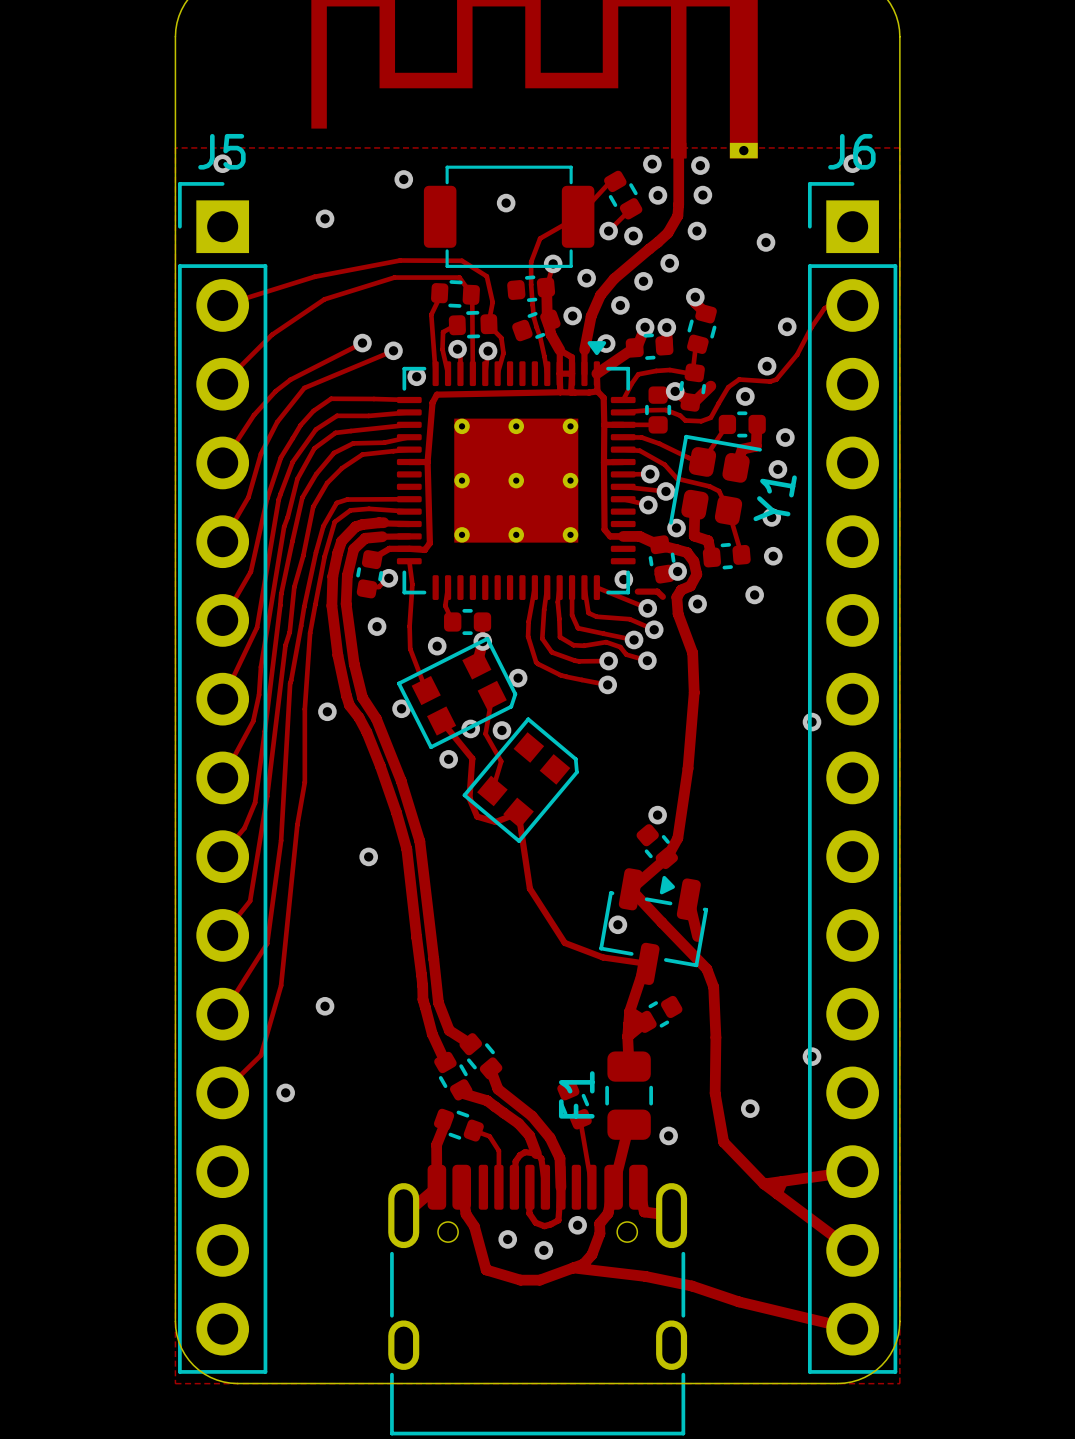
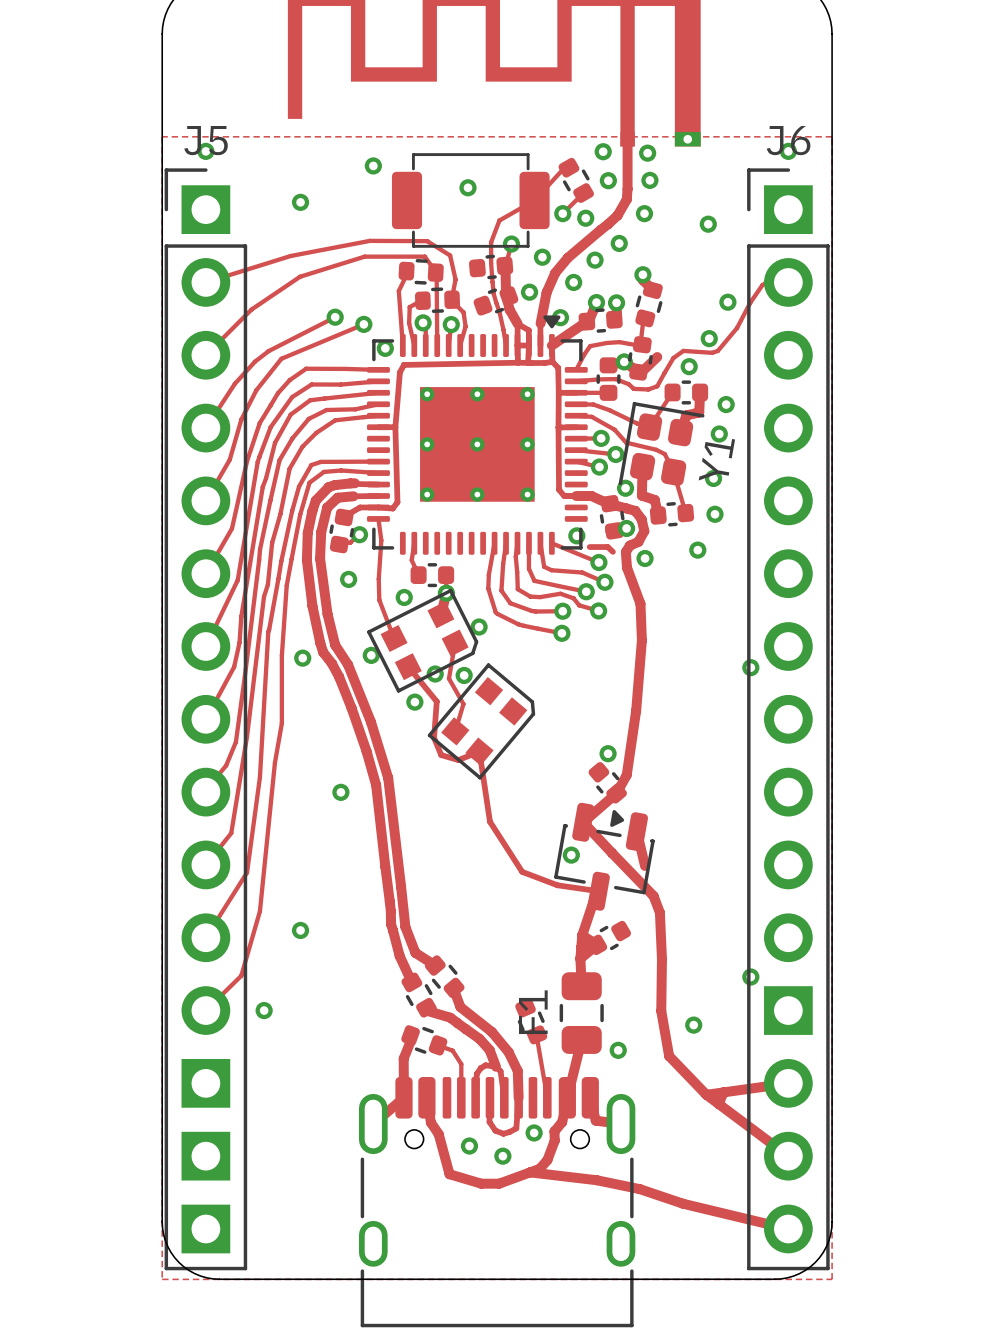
J5 footprint: [178, 182, 268, 1374] -> [164, 168, 248, 1271]
J6 footprint: [807, 182, 898, 1374] -> [747, 168, 830, 1271]

